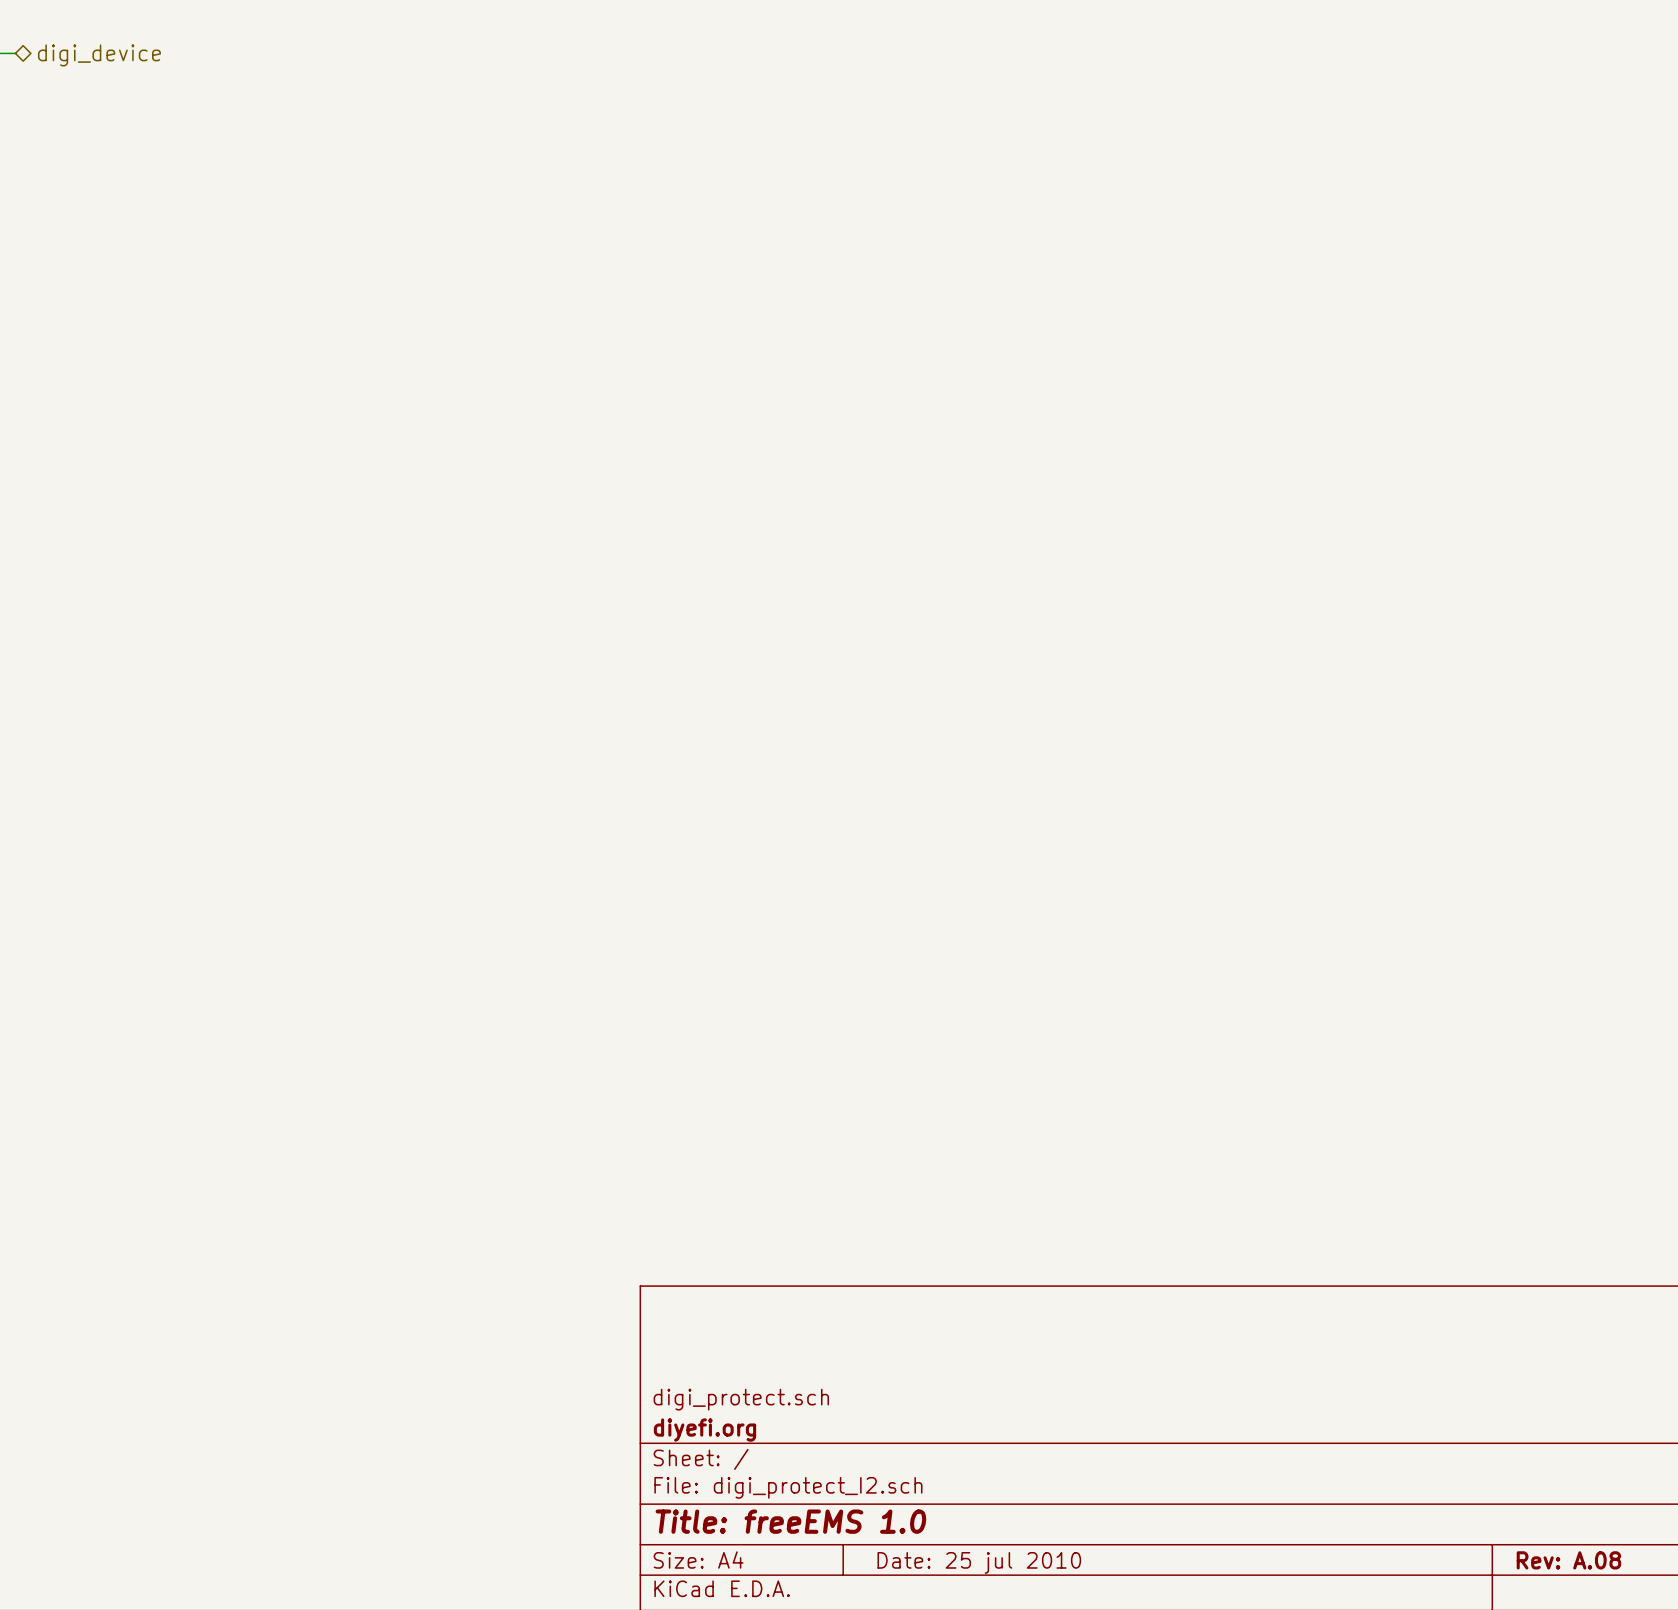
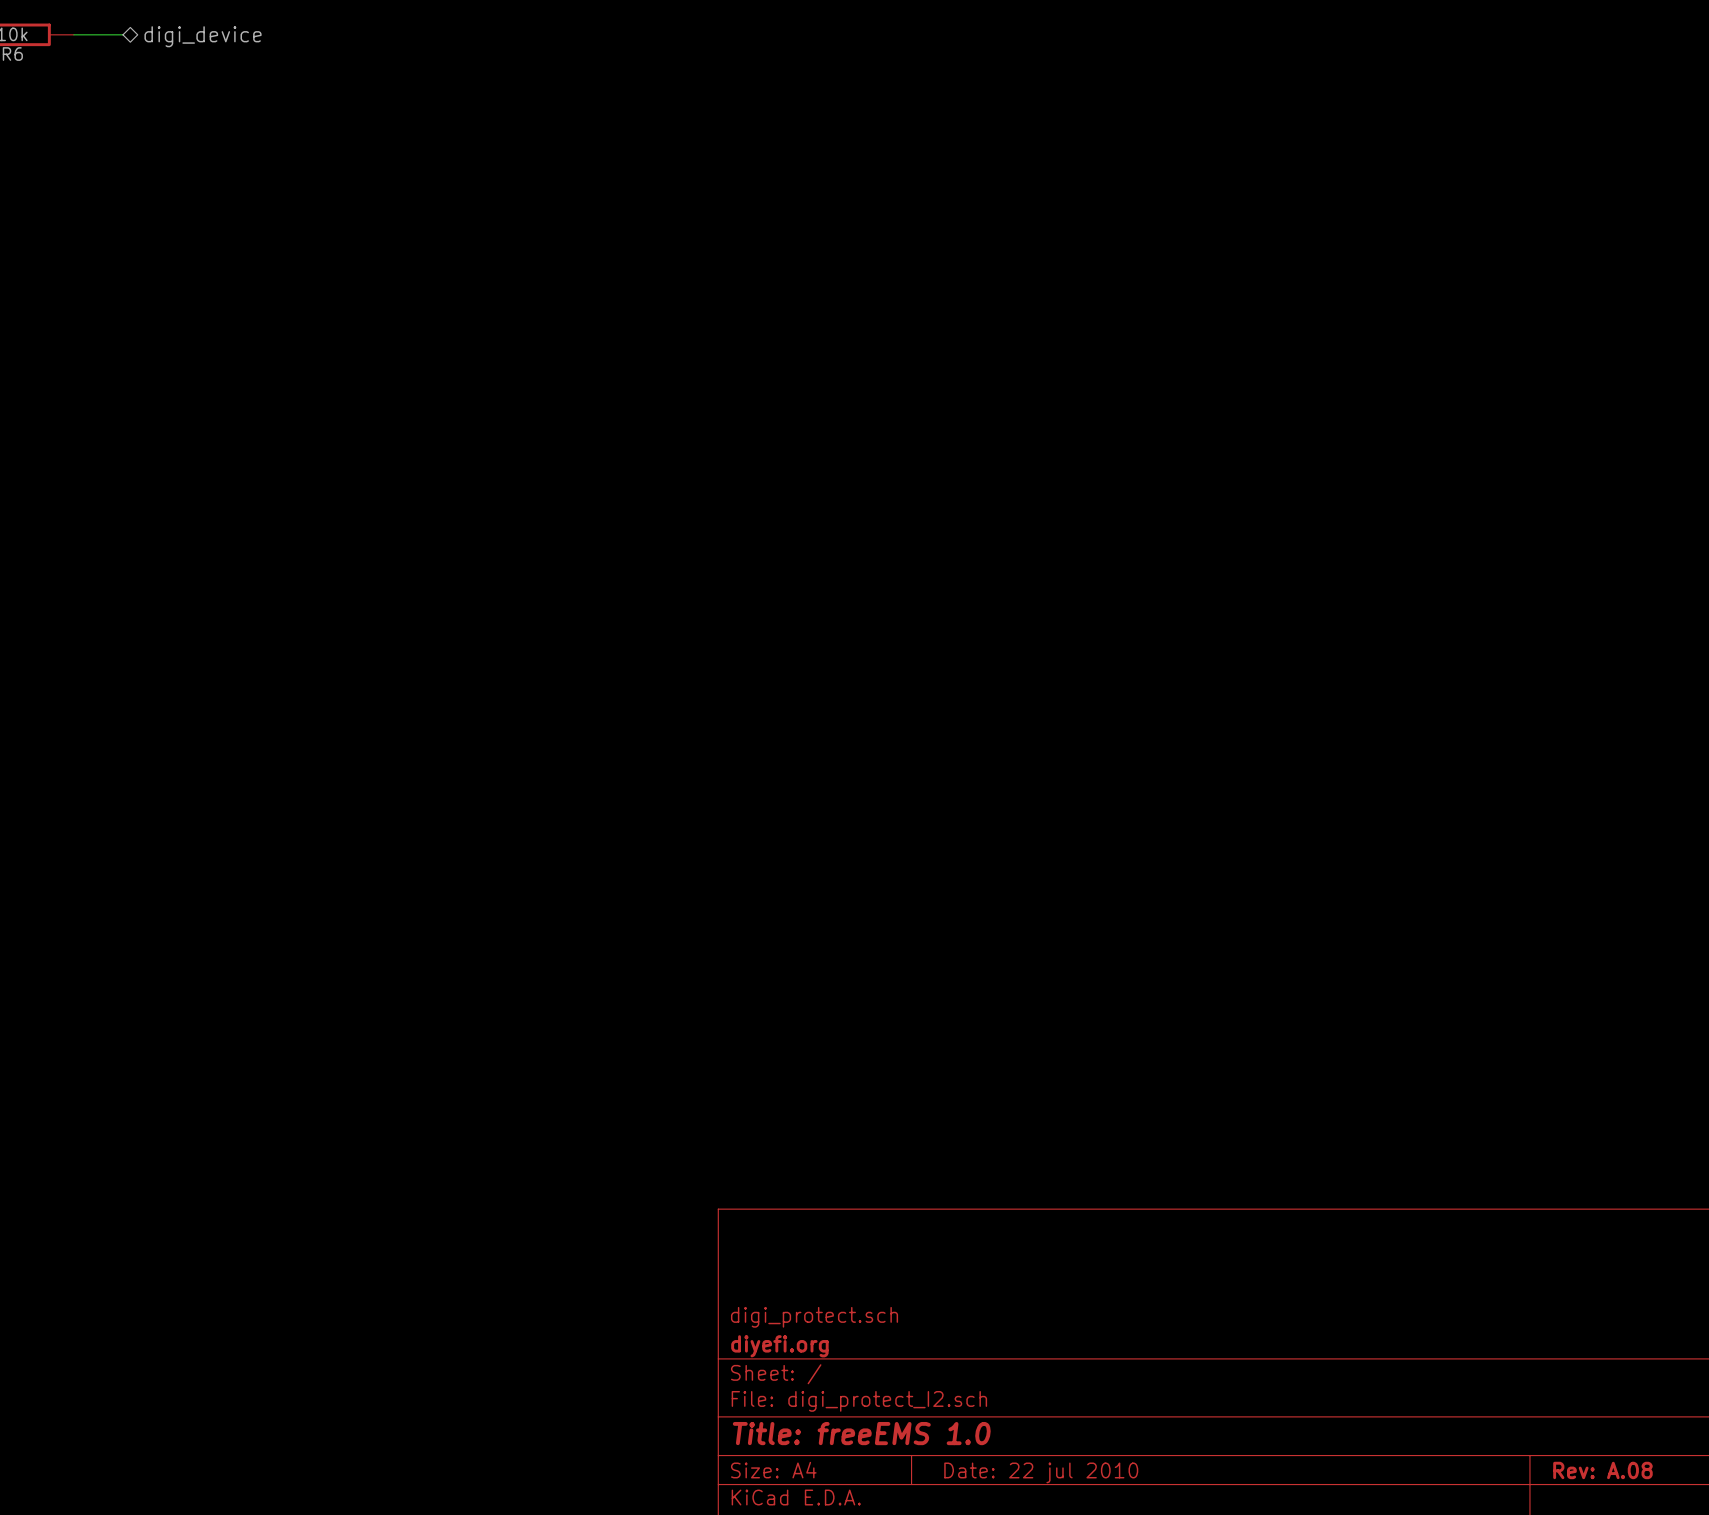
title block: Date: 25 jul 2010 (979, 1562) -> Date: 22 jul 2010 (1041, 1472)

